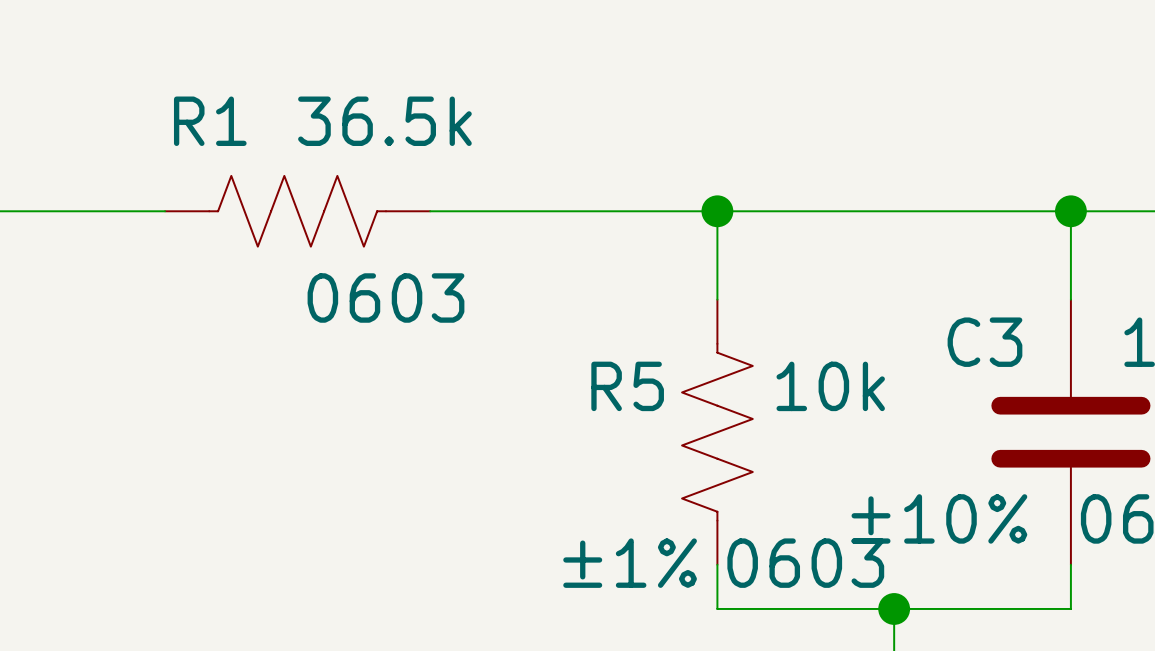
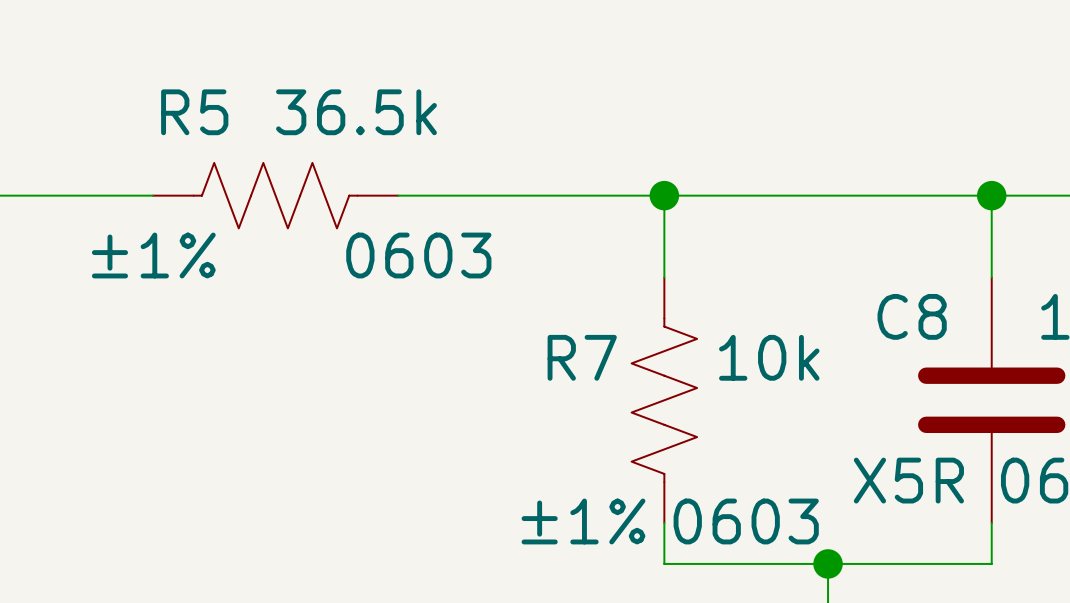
R1 name: R1 (210, 121) -> R5 (194, 112)
R1 text: none -> ±1% (153, 255)
R1 text position: 0603 (385, 298) -> 0603 (418, 255)
C3 name: C3 (984, 342) -> C8 (912, 316)
R5 name: R5 (627, 386) -> R7 (582, 357)
C3 text: ±10% (939, 518) -> none
C3 text: none -> X5R (908, 480)

